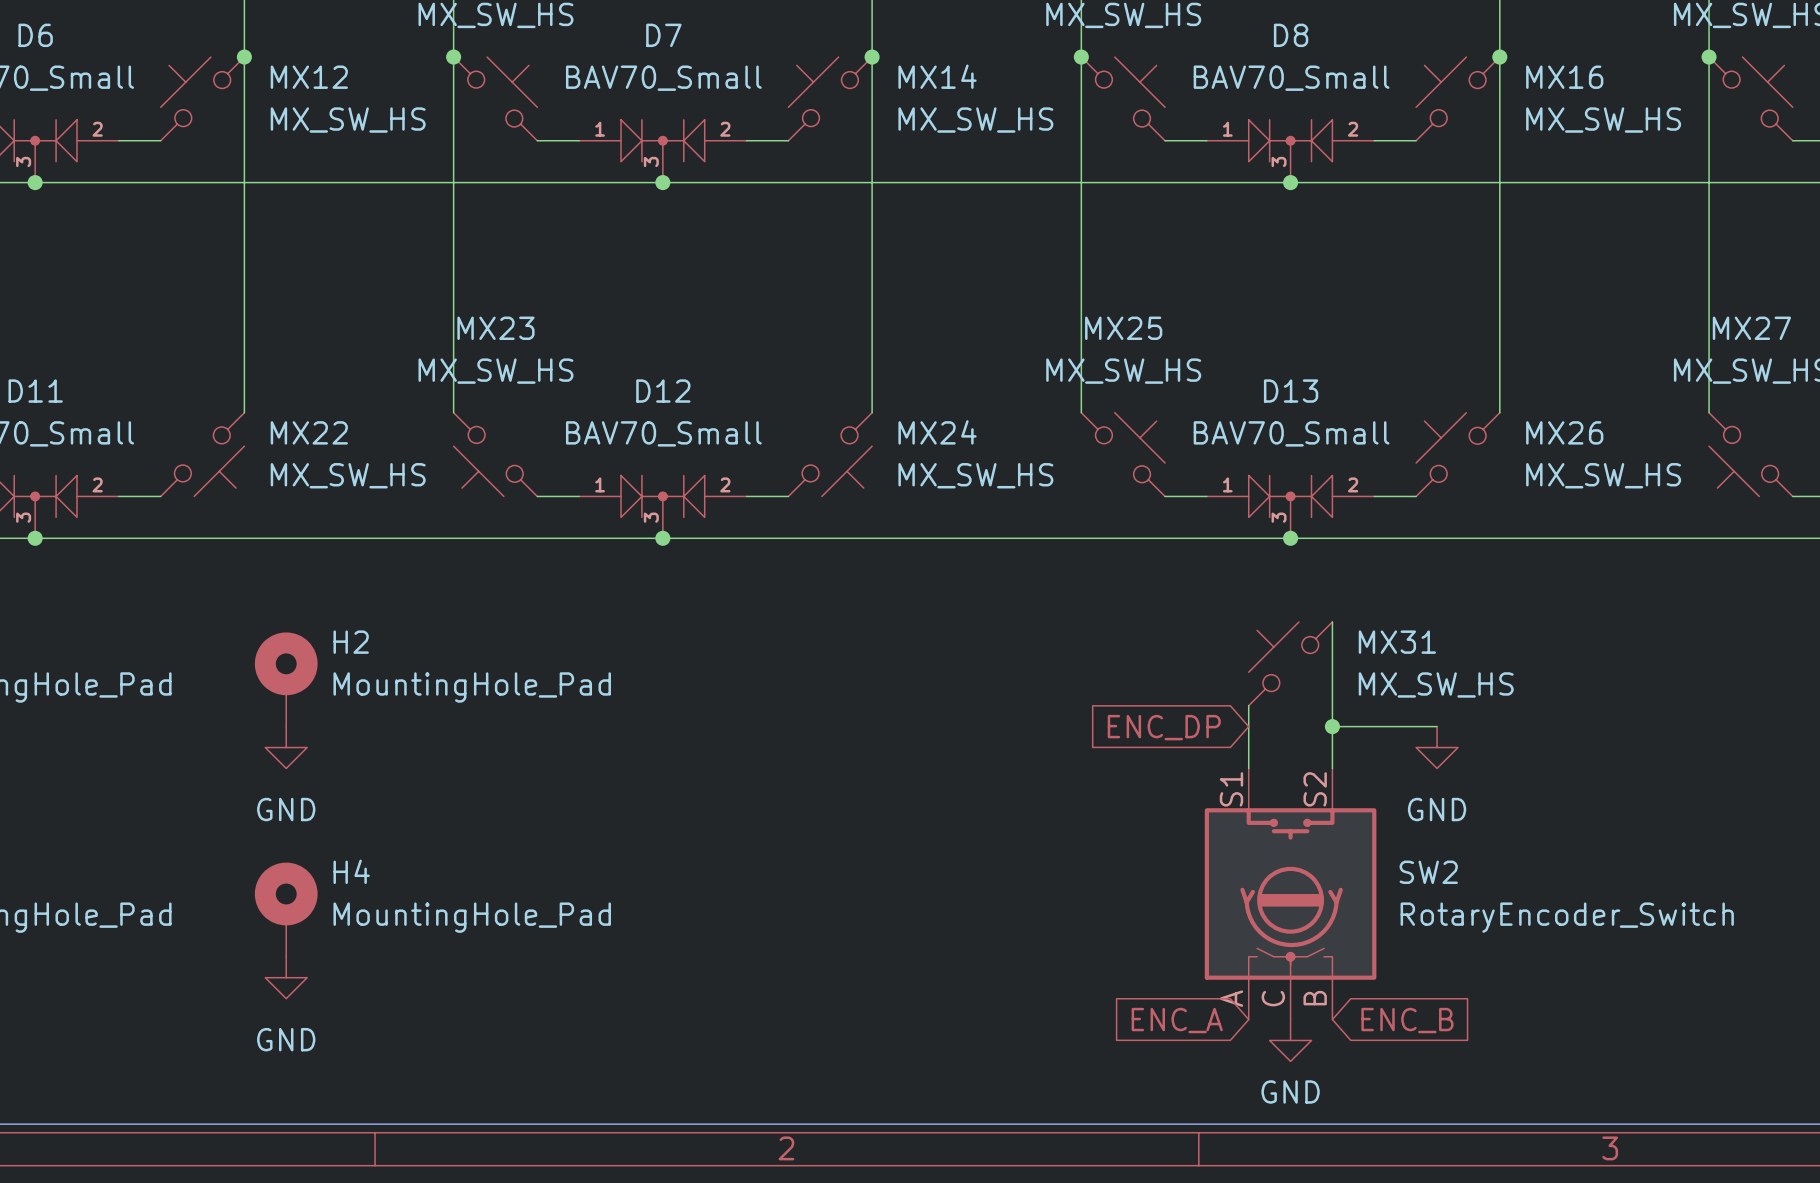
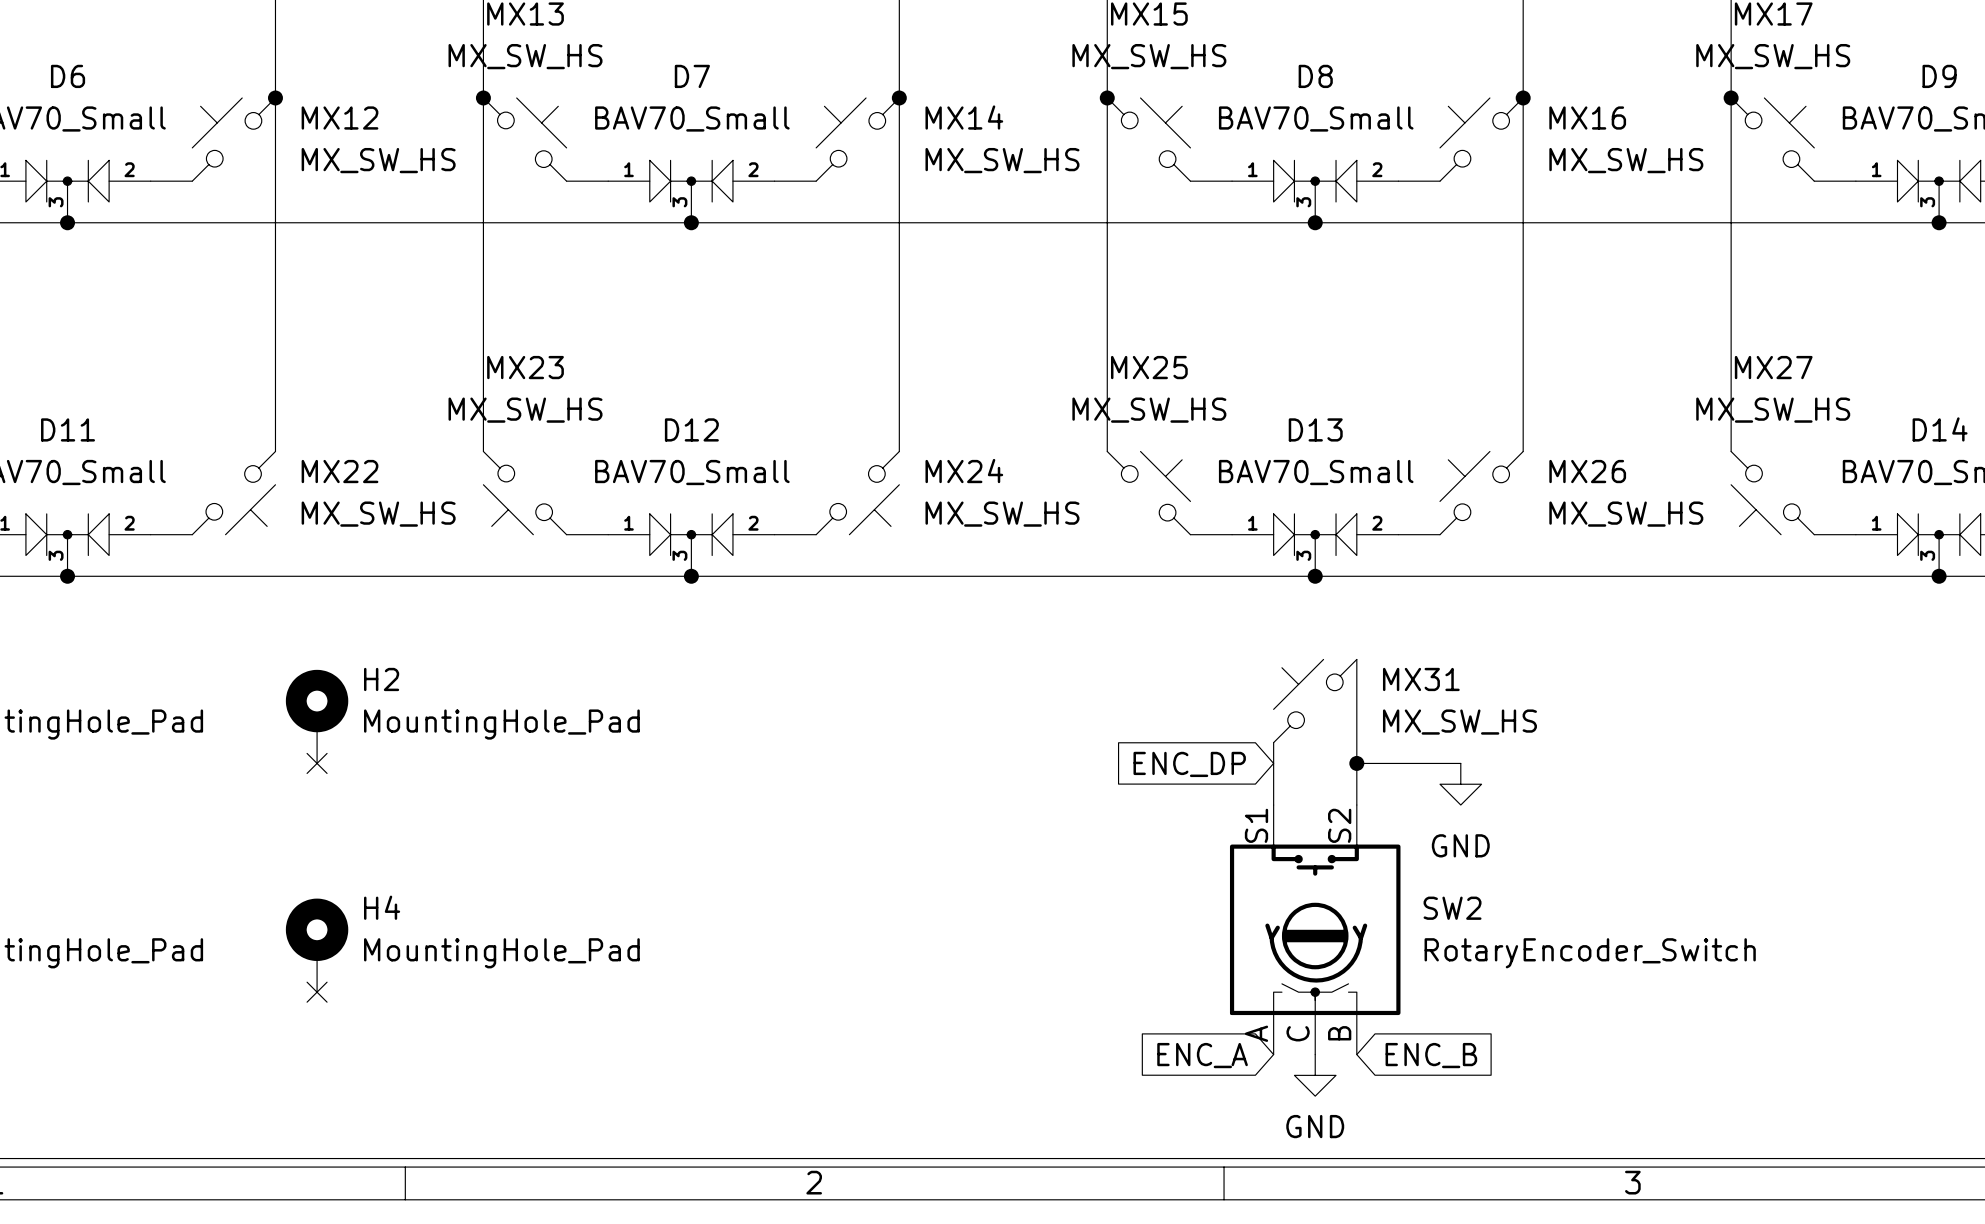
no-connect mark: none -> (317, 763)
power symbol: GND (286, 747) -> none
no-connect mark: none -> (317, 992)
power symbol: GND (286, 977) -> none

